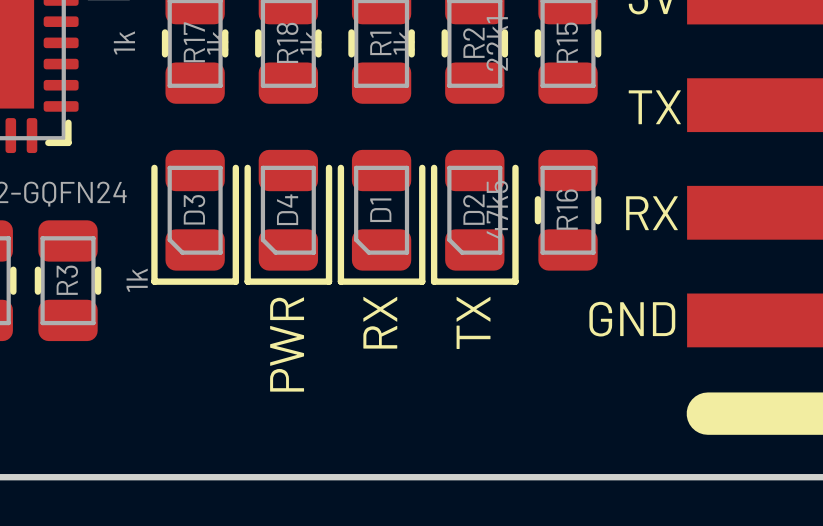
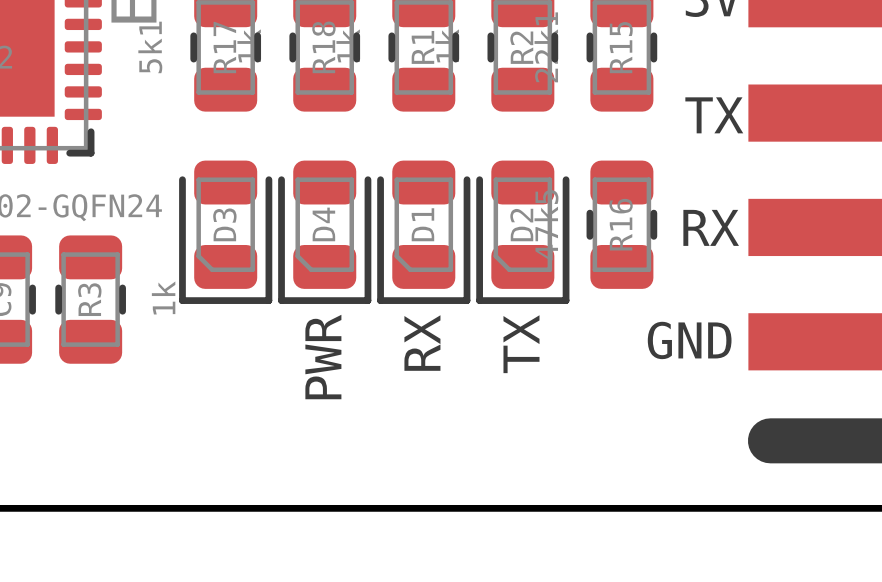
R17 value: 1k (124, 42) -> 5k1 (150, 47)

